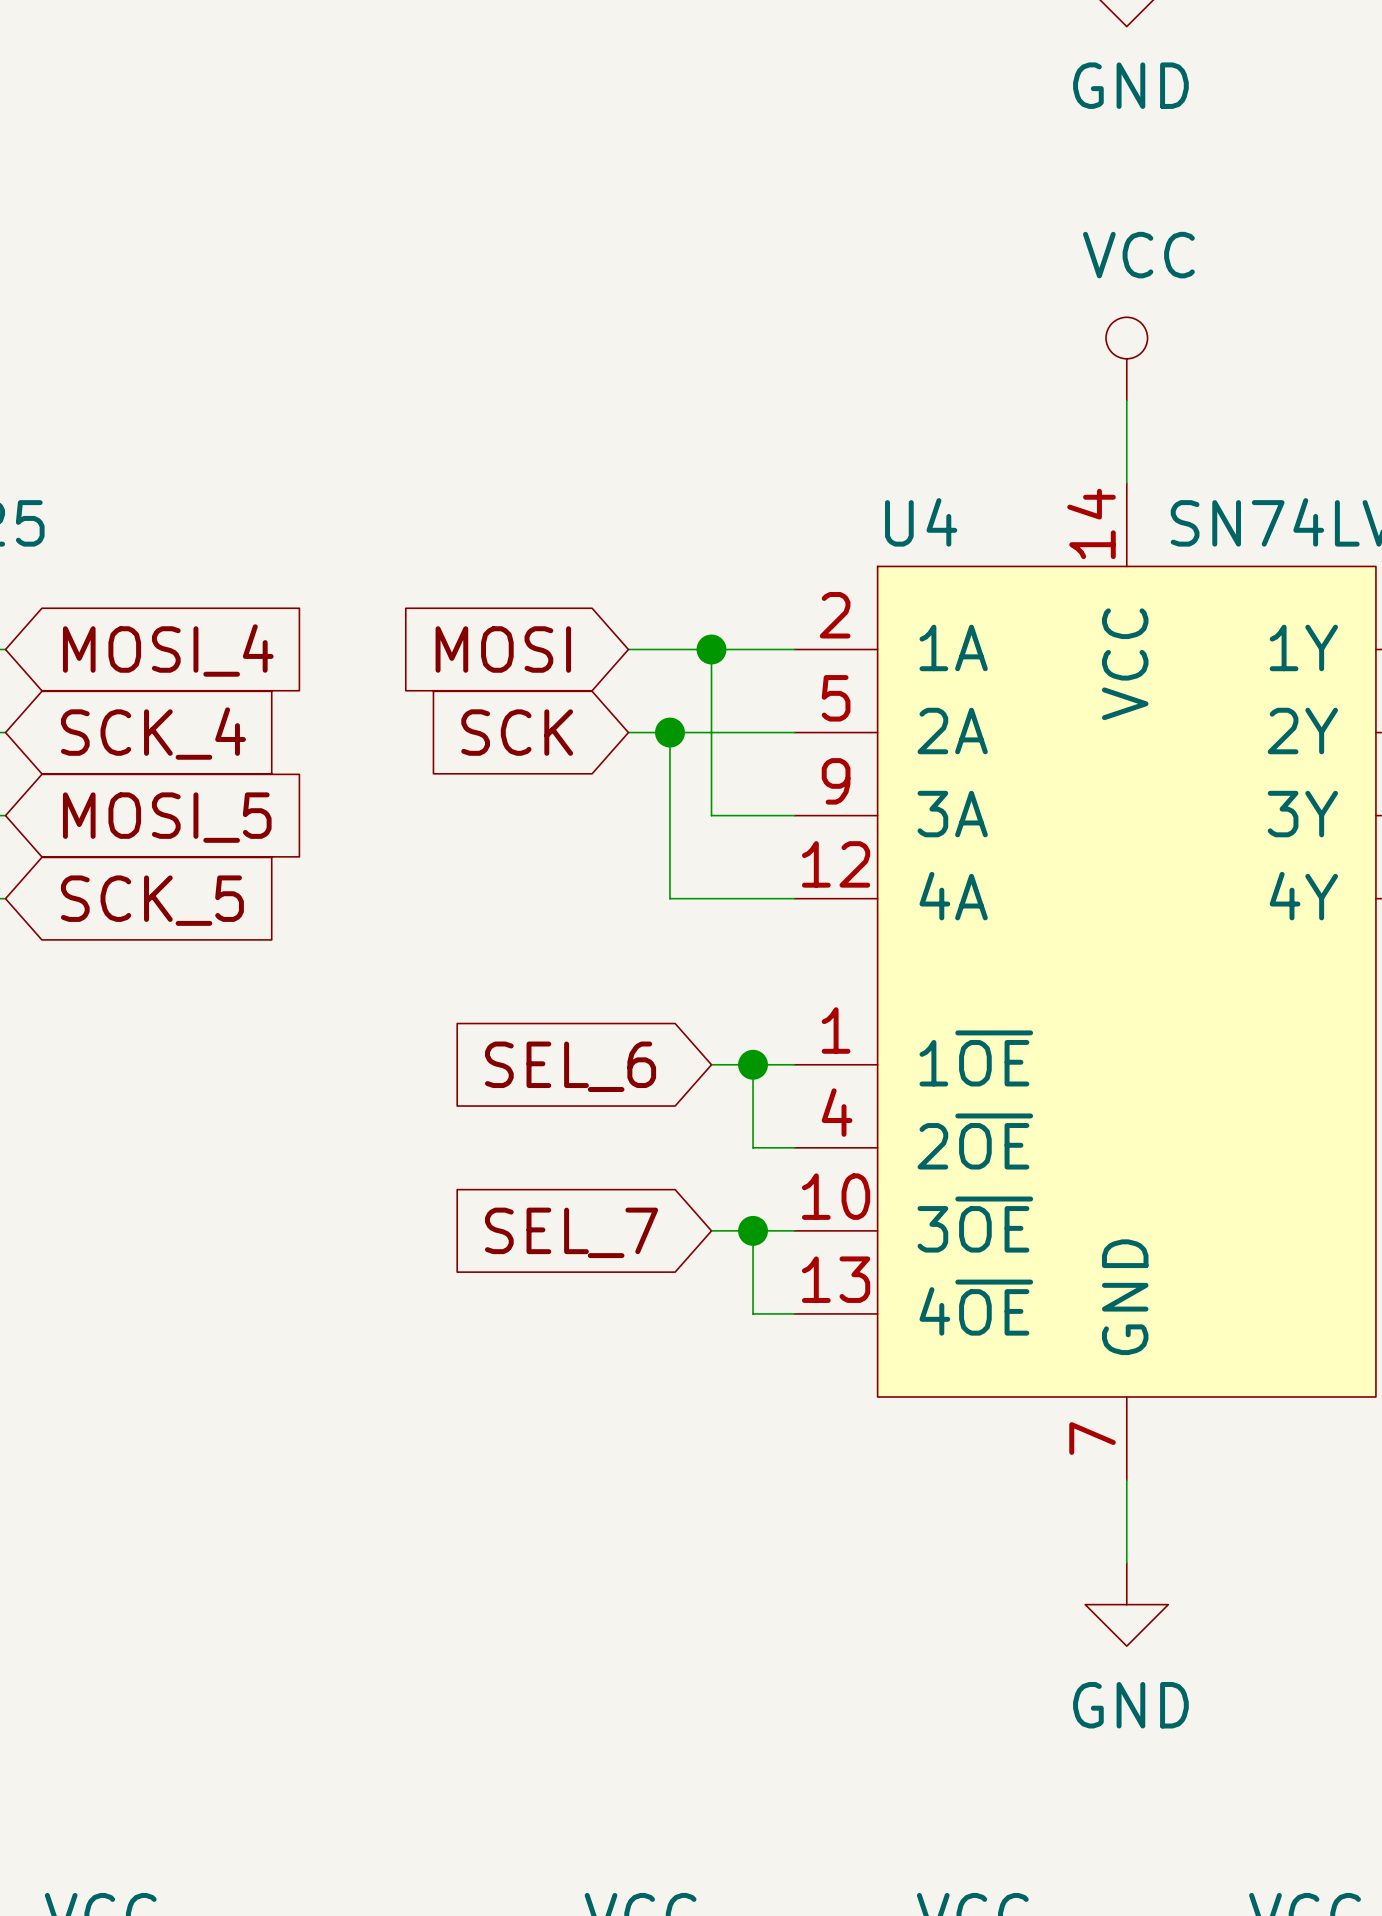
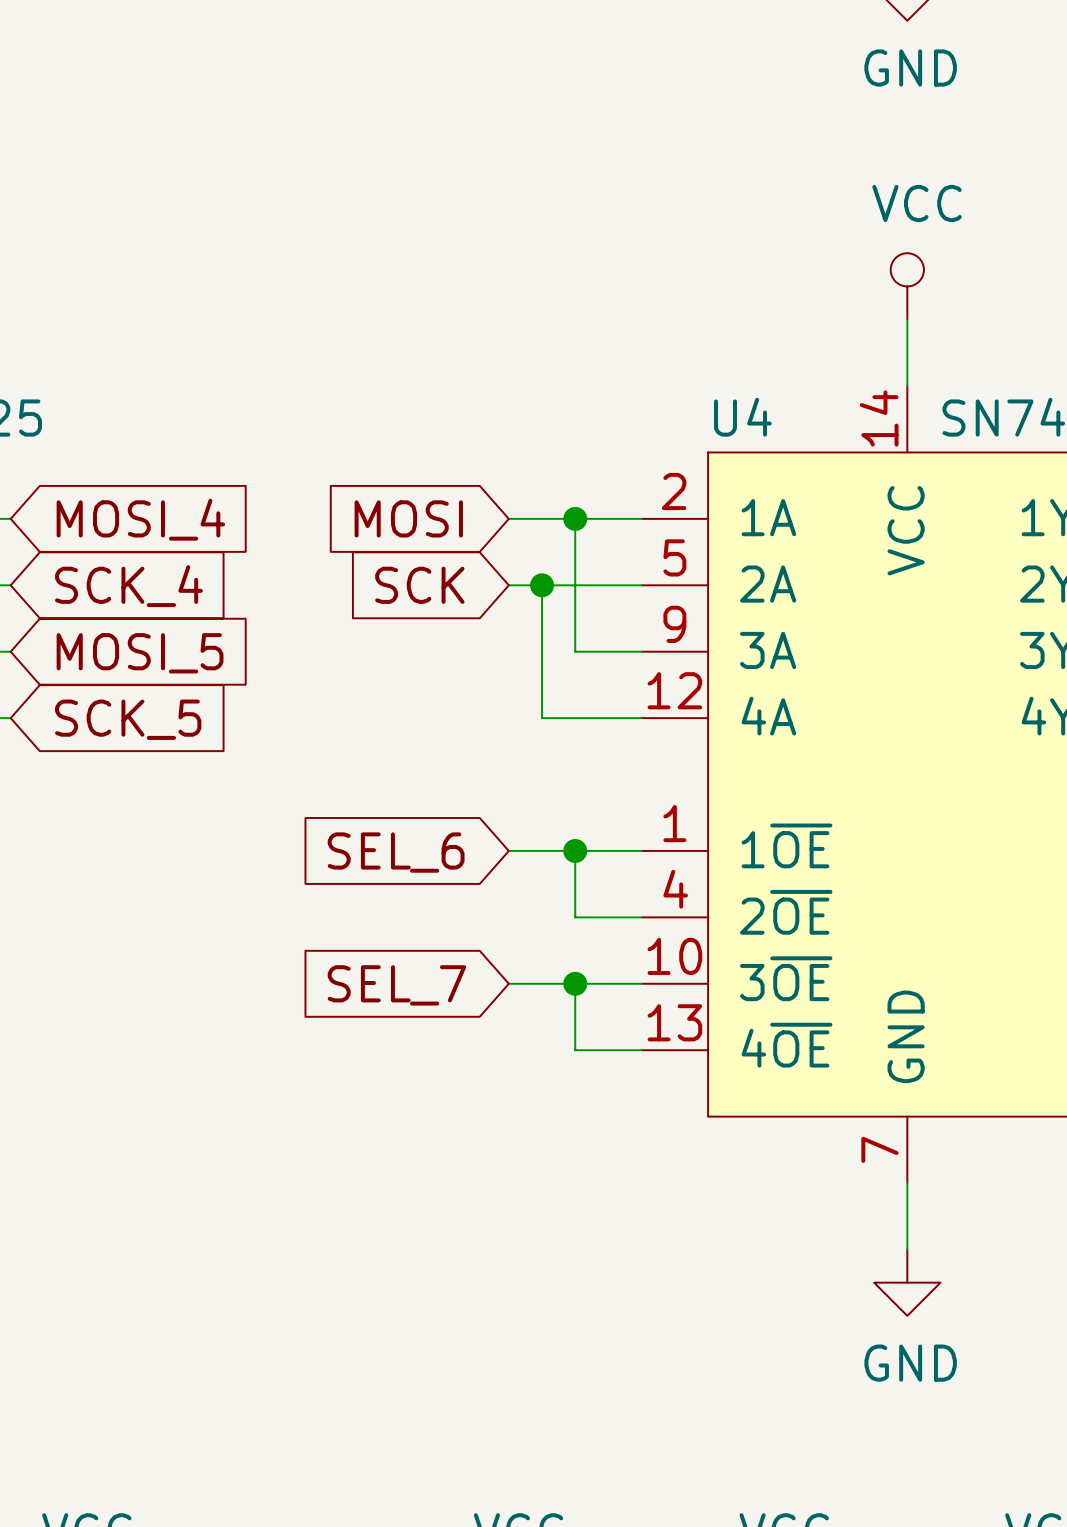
wire: (753, 1064) (753, 1147) -> (508, 850) (575, 850) (575, 917) (608, 917)
junction position: (753, 1064) -> (575, 850)
global label position: SEL_6 (570, 1066) -> SEL_6 (396, 852)
wire: (753, 1230) (753, 1313) -> (508, 983) (575, 983) (575, 1050) (608, 1050)
junction position: (753, 1230) -> (575, 983)
global label position: SEL_7 (571, 1232) -> SEL_7 (396, 985)

